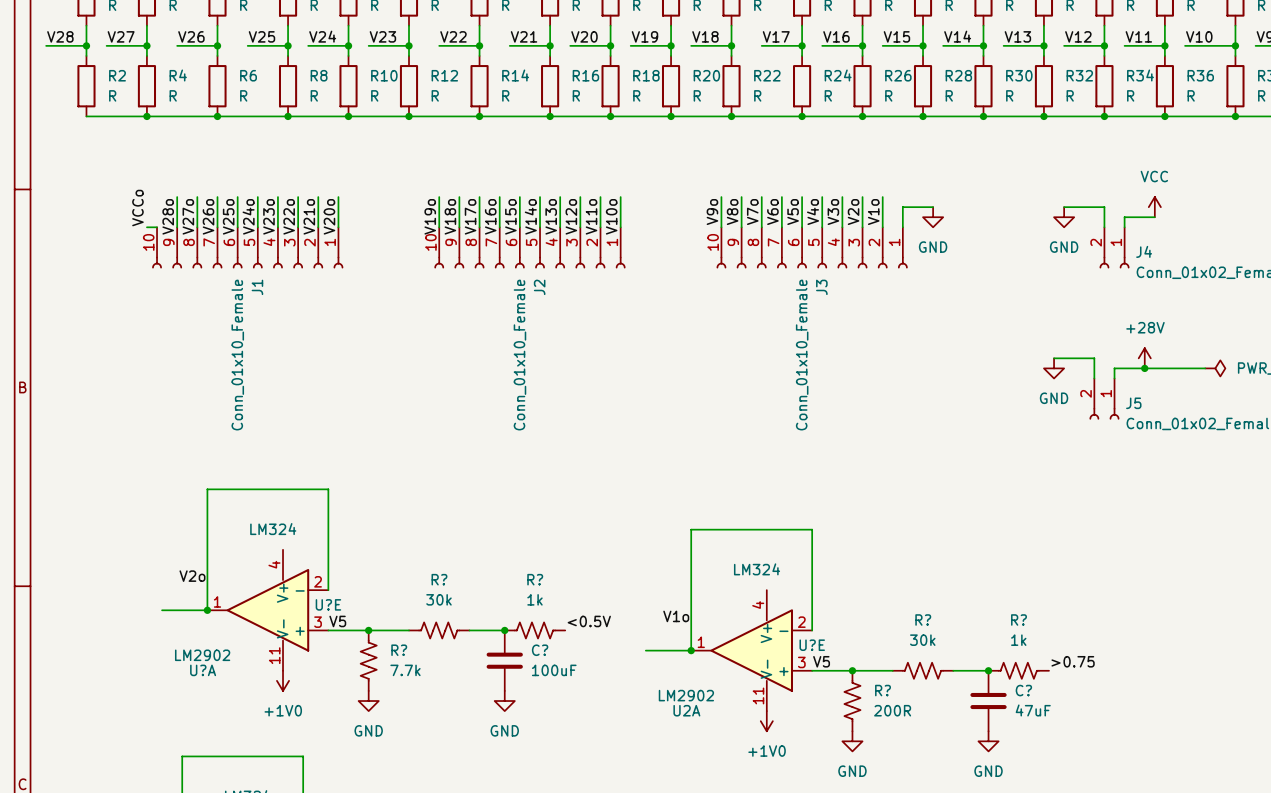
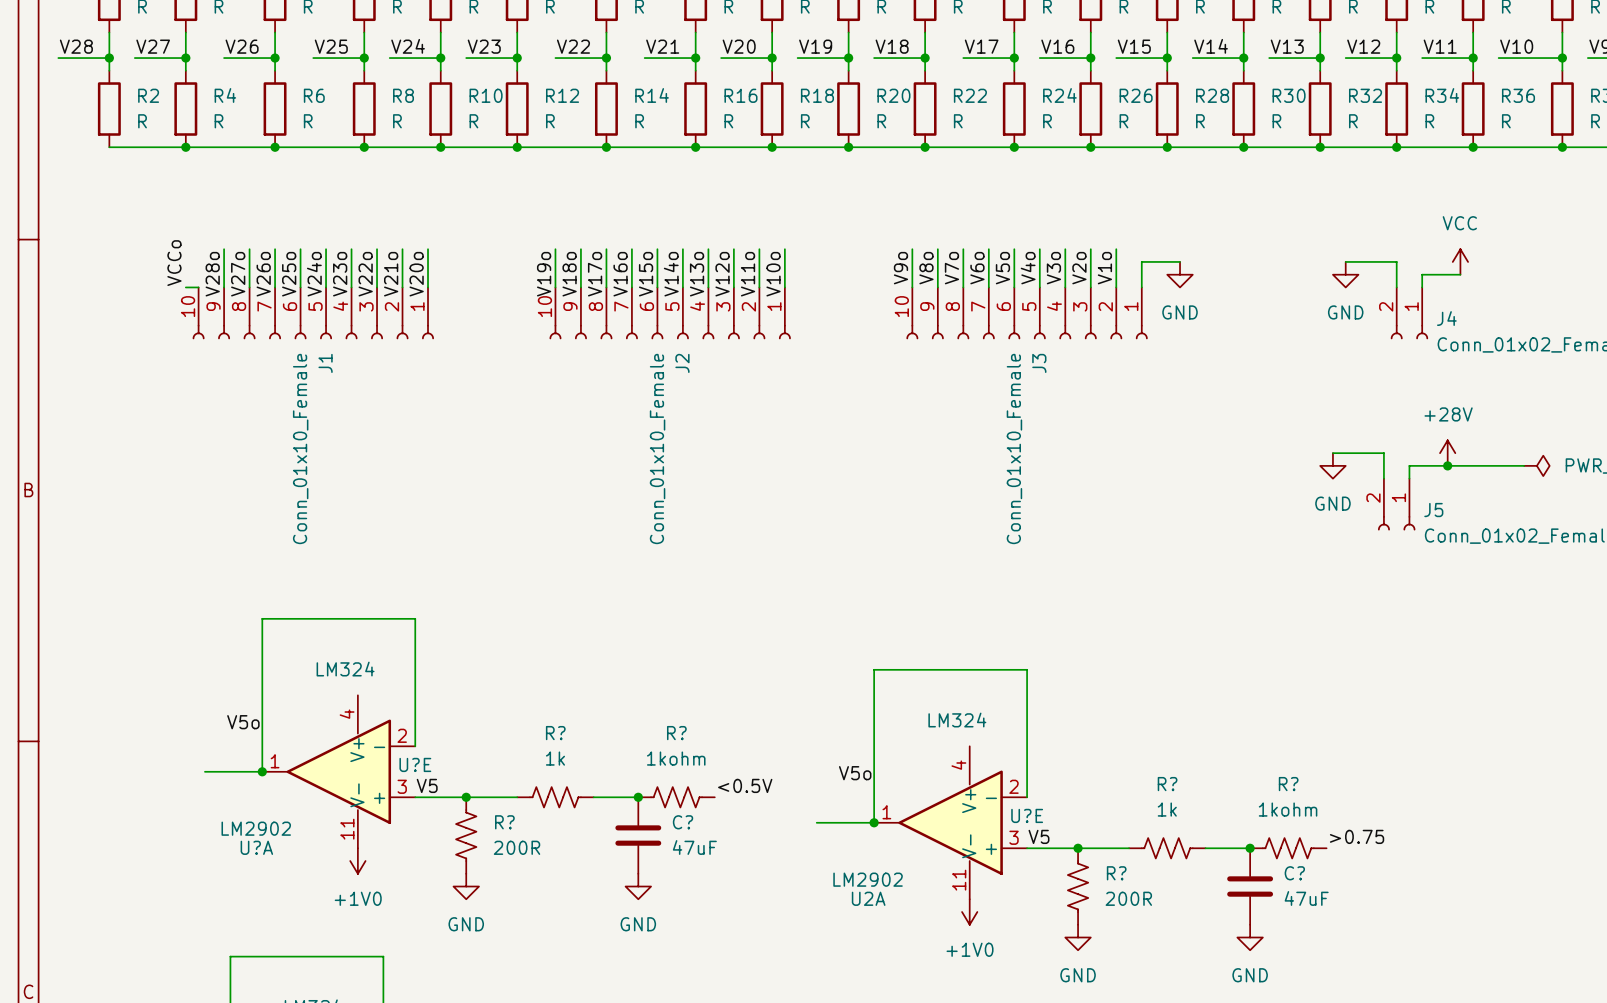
label: V2o (192, 576) -> V5o (243, 722)
R? value: 30k (438, 599) -> 1k (555, 758)
R? value: 1k (534, 599) -> 1kohm (676, 758)
label: V1o (676, 616) -> V5o (855, 773)
R? value: 30k (922, 640) -> 1k (1167, 809)
R? value: 1k (1018, 640) -> 1kohm (1288, 809)
R? value: 7.7k (405, 670) -> 200R (517, 847)
C? value: 100uF (554, 670) -> 47uF (694, 847)

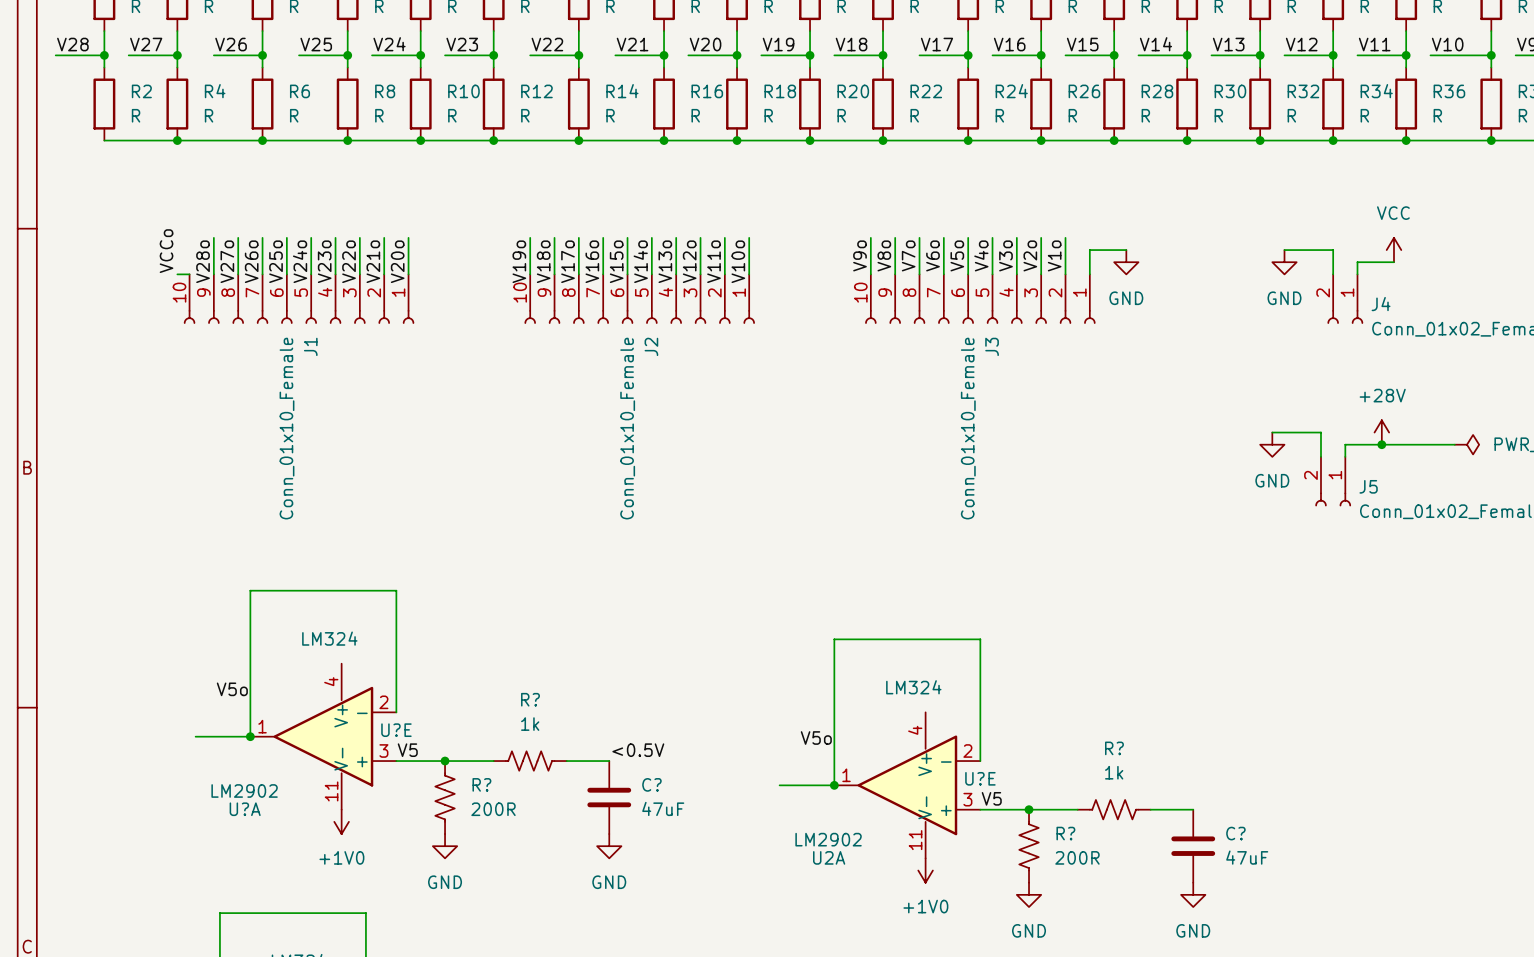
label position: <0.5V (745, 785) -> <0.5V (638, 750)
junction: (638, 797) -> none
R?: 1kohm (676, 797) -> none
label: >0.75 (1357, 836) -> none
junction: (1250, 848) -> none
R?: 1kohm (1288, 848) -> none

